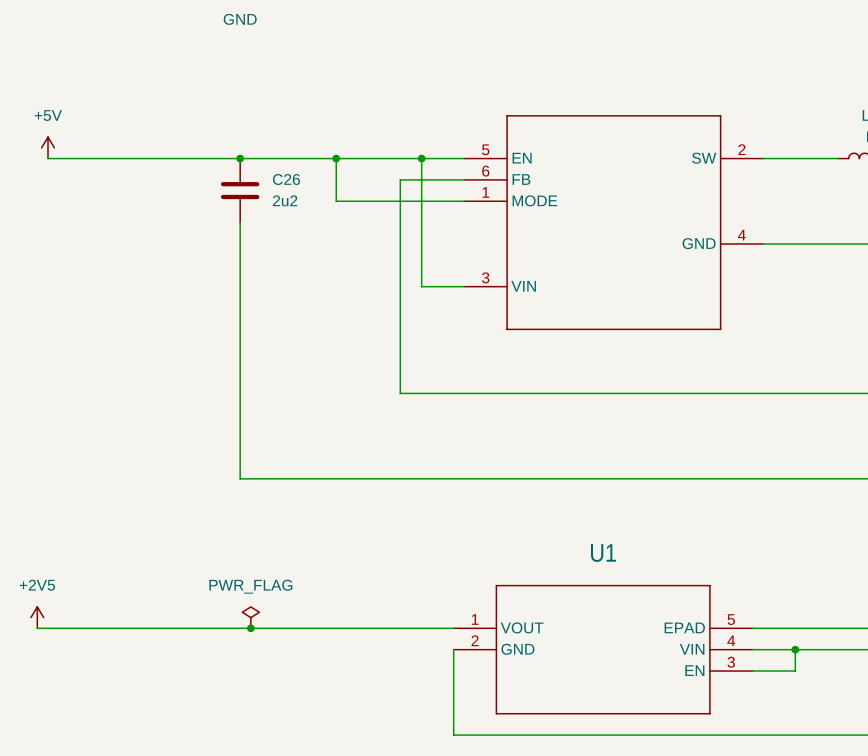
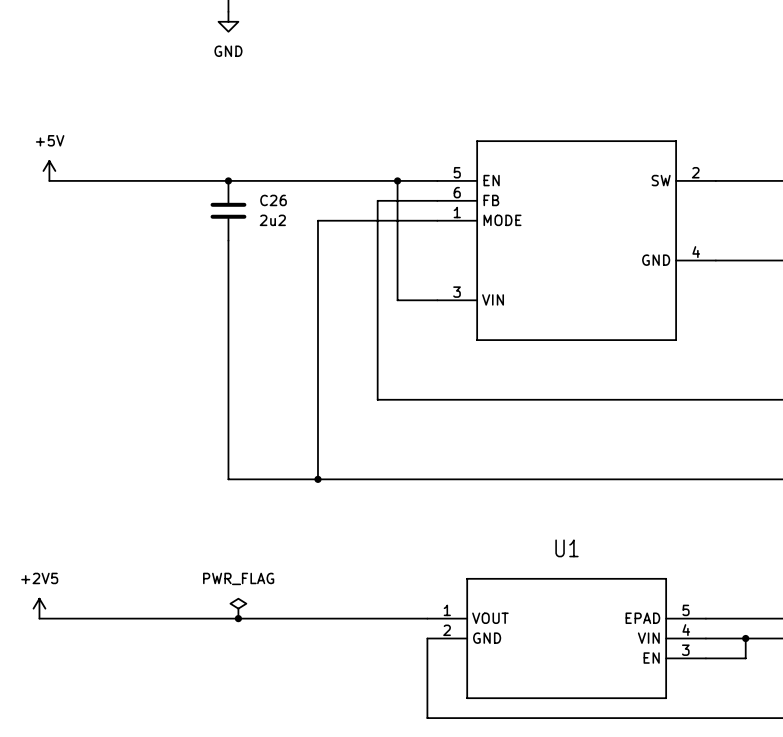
wire: (336, 158) (336, 201) -> (317, 479) (317, 220)
junction: (336, 158) -> none
junction: none -> (317, 479)

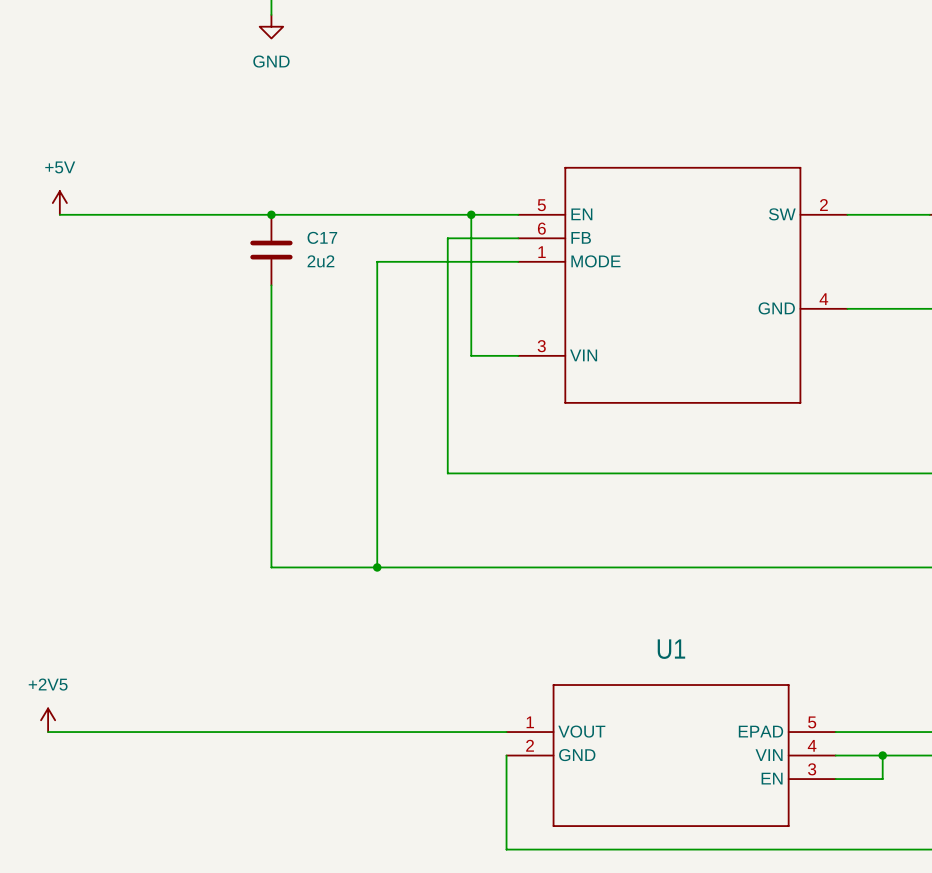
C26 name: C26 (273, 200) -> C17 (322, 237)
power symbol: PWR_FLAG (238, 608) -> none
junction: (238, 618) -> none

